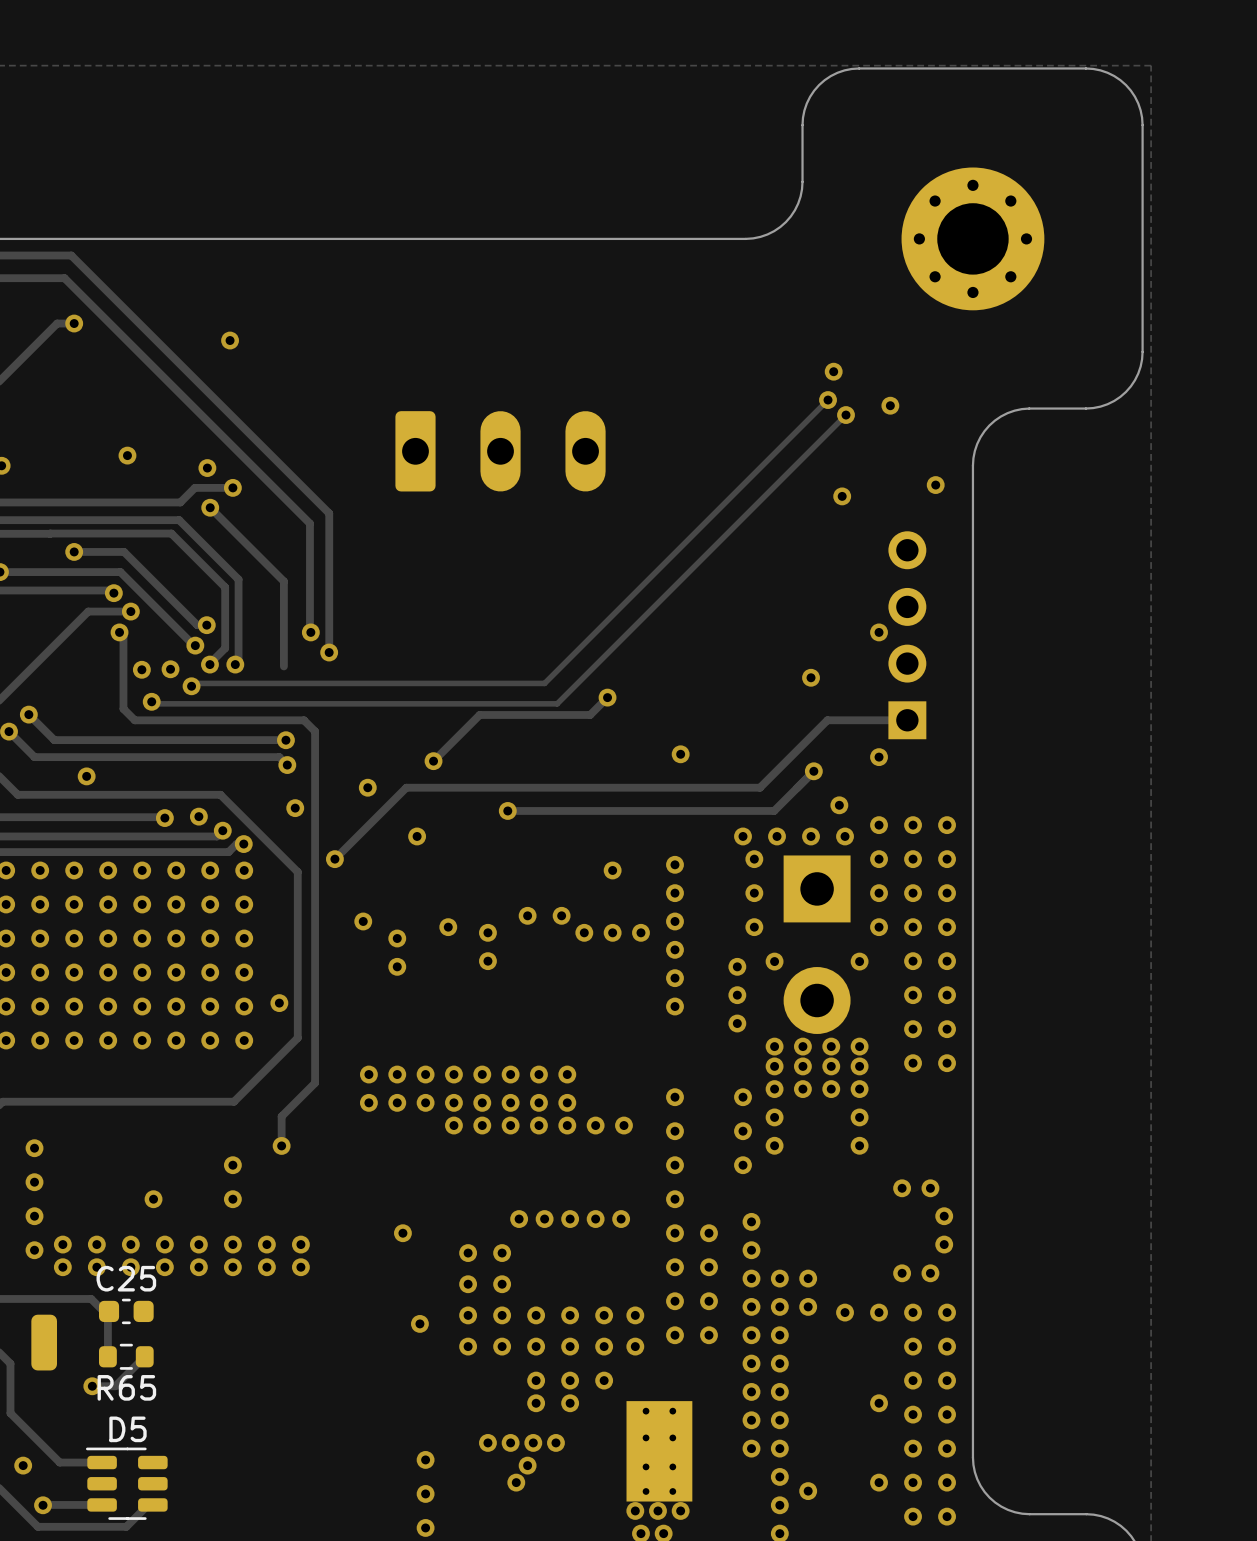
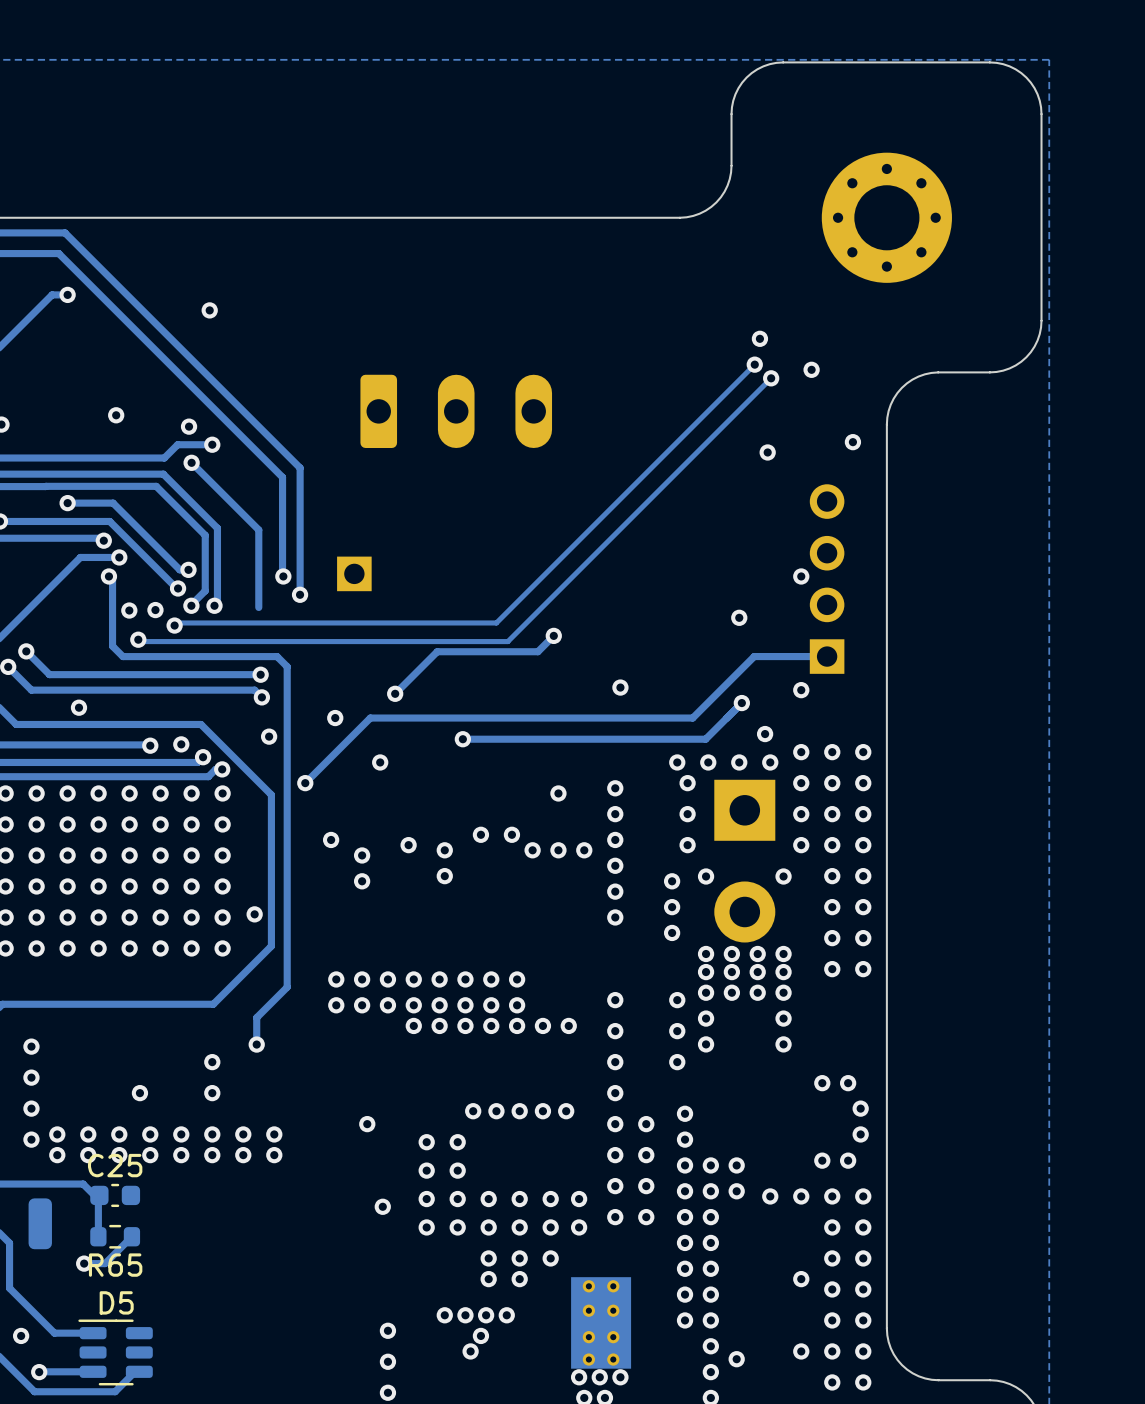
part: none -> (354, 573)

